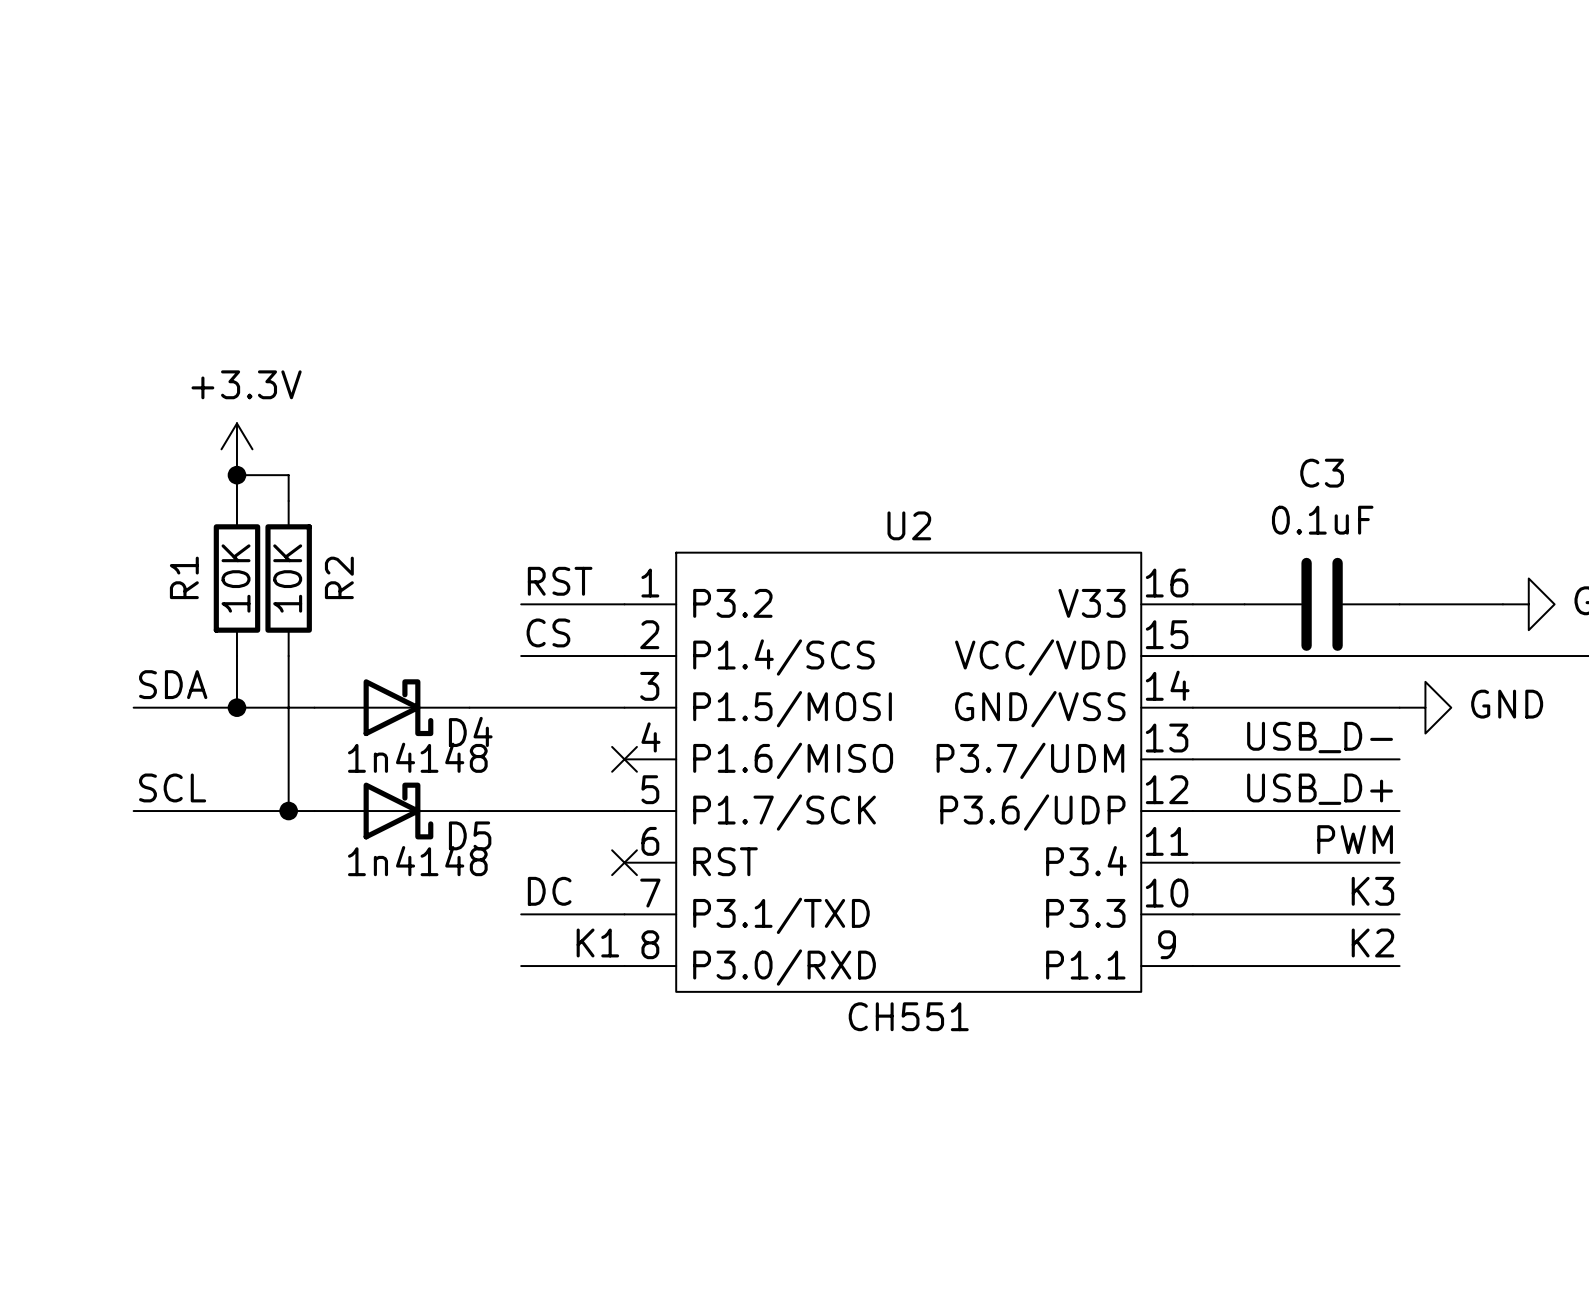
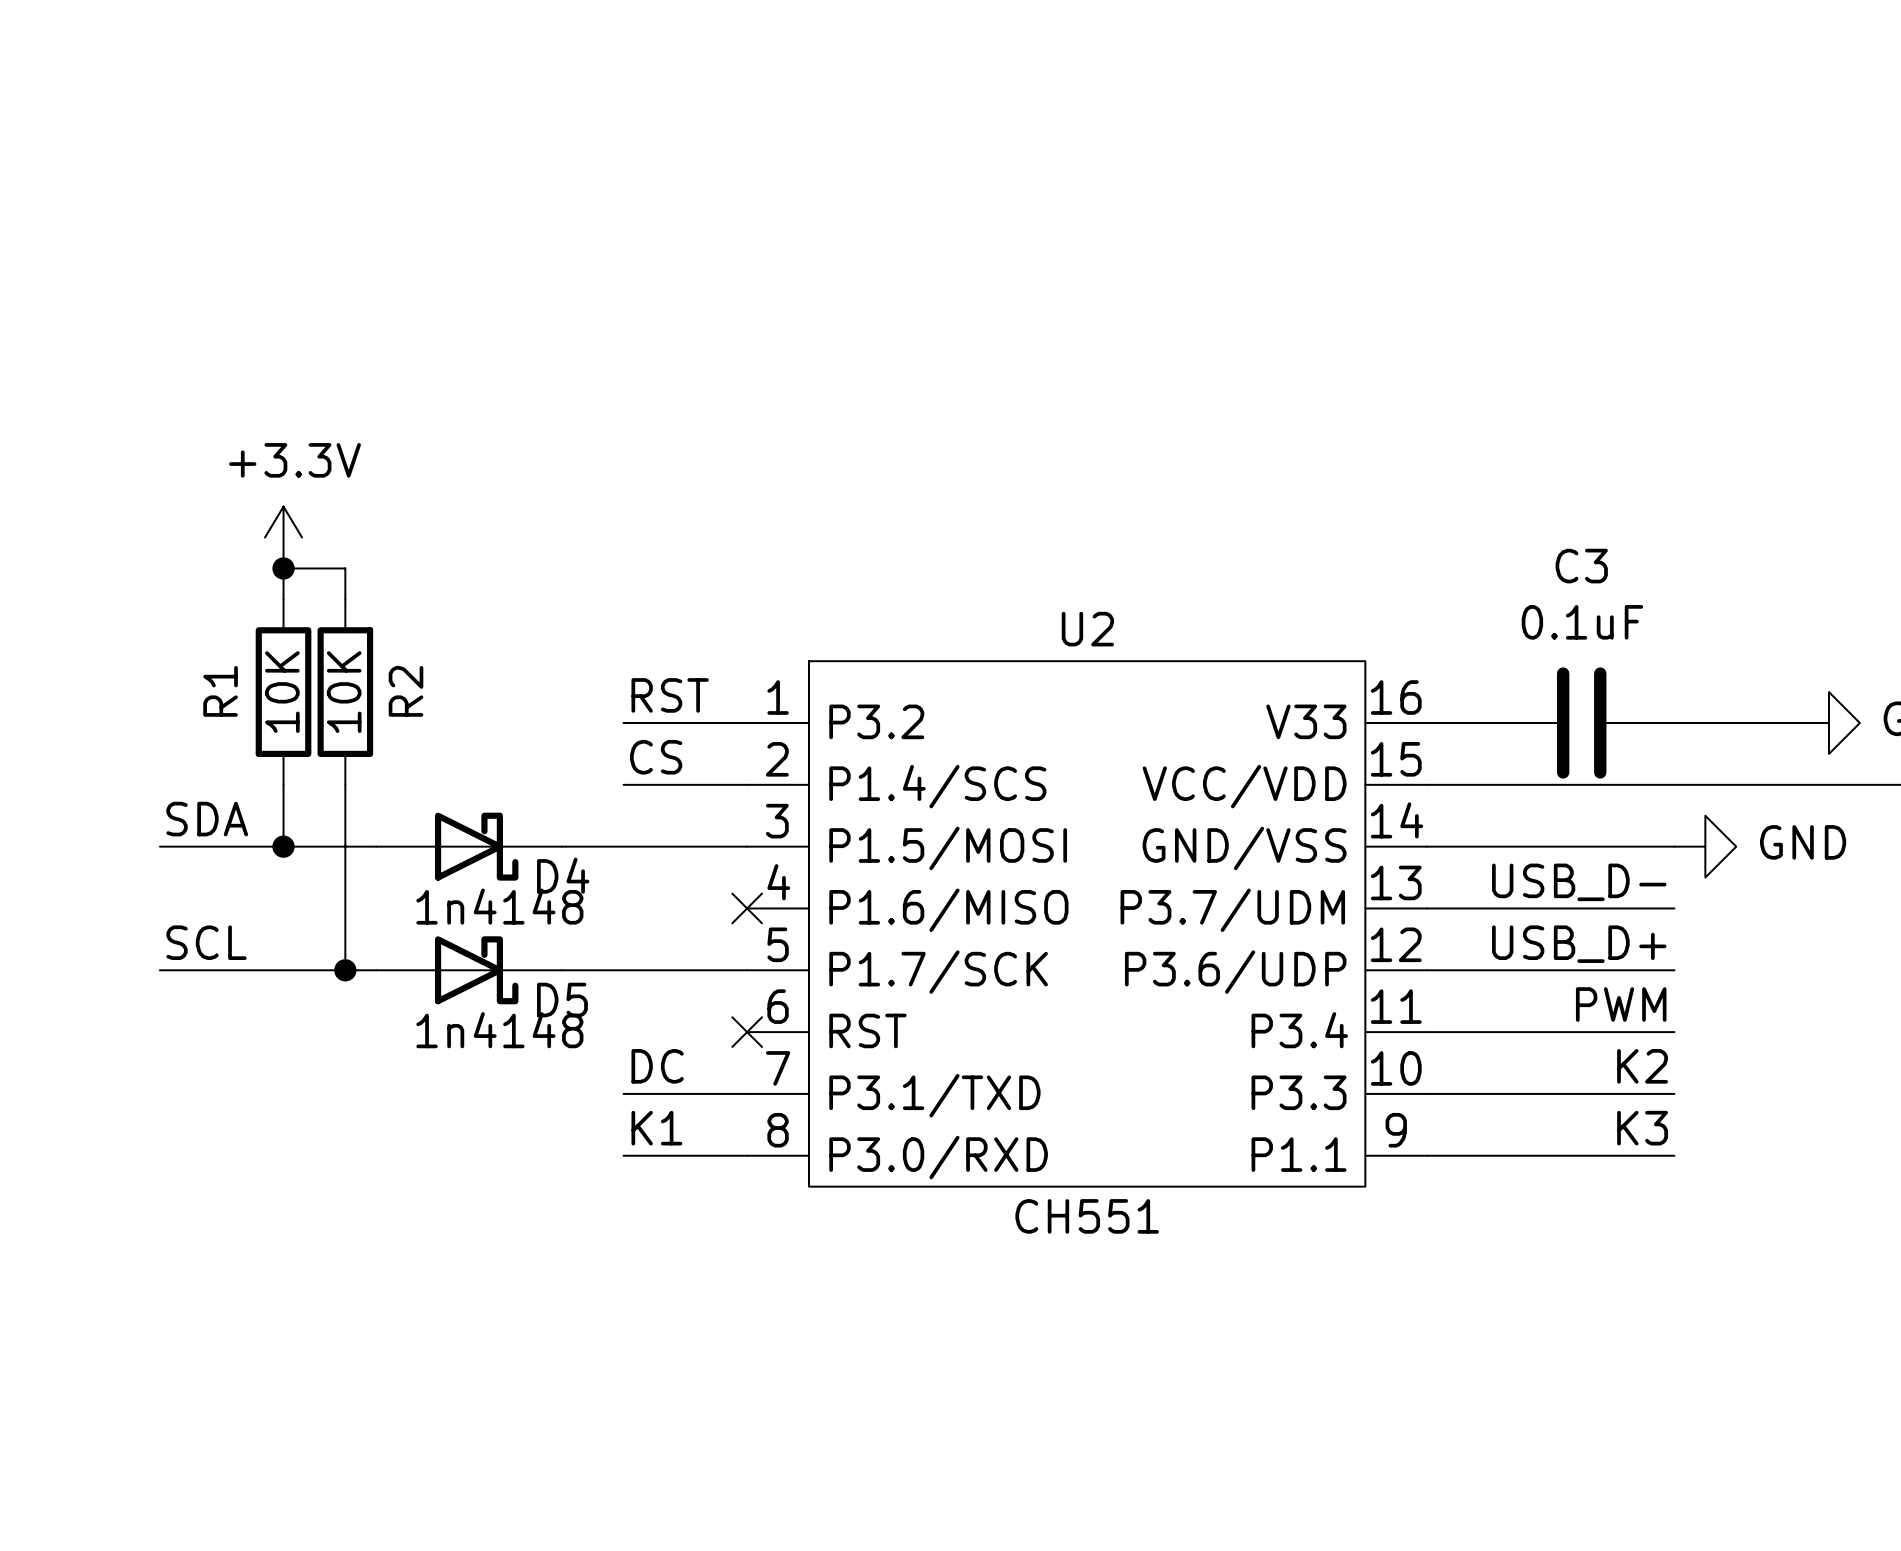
label: K3 (1372, 891) -> K2 (1642, 1066)
label position: K1 (597, 942) -> K1 (656, 1128)
label: K2 (1372, 942) -> K3 (1642, 1128)

